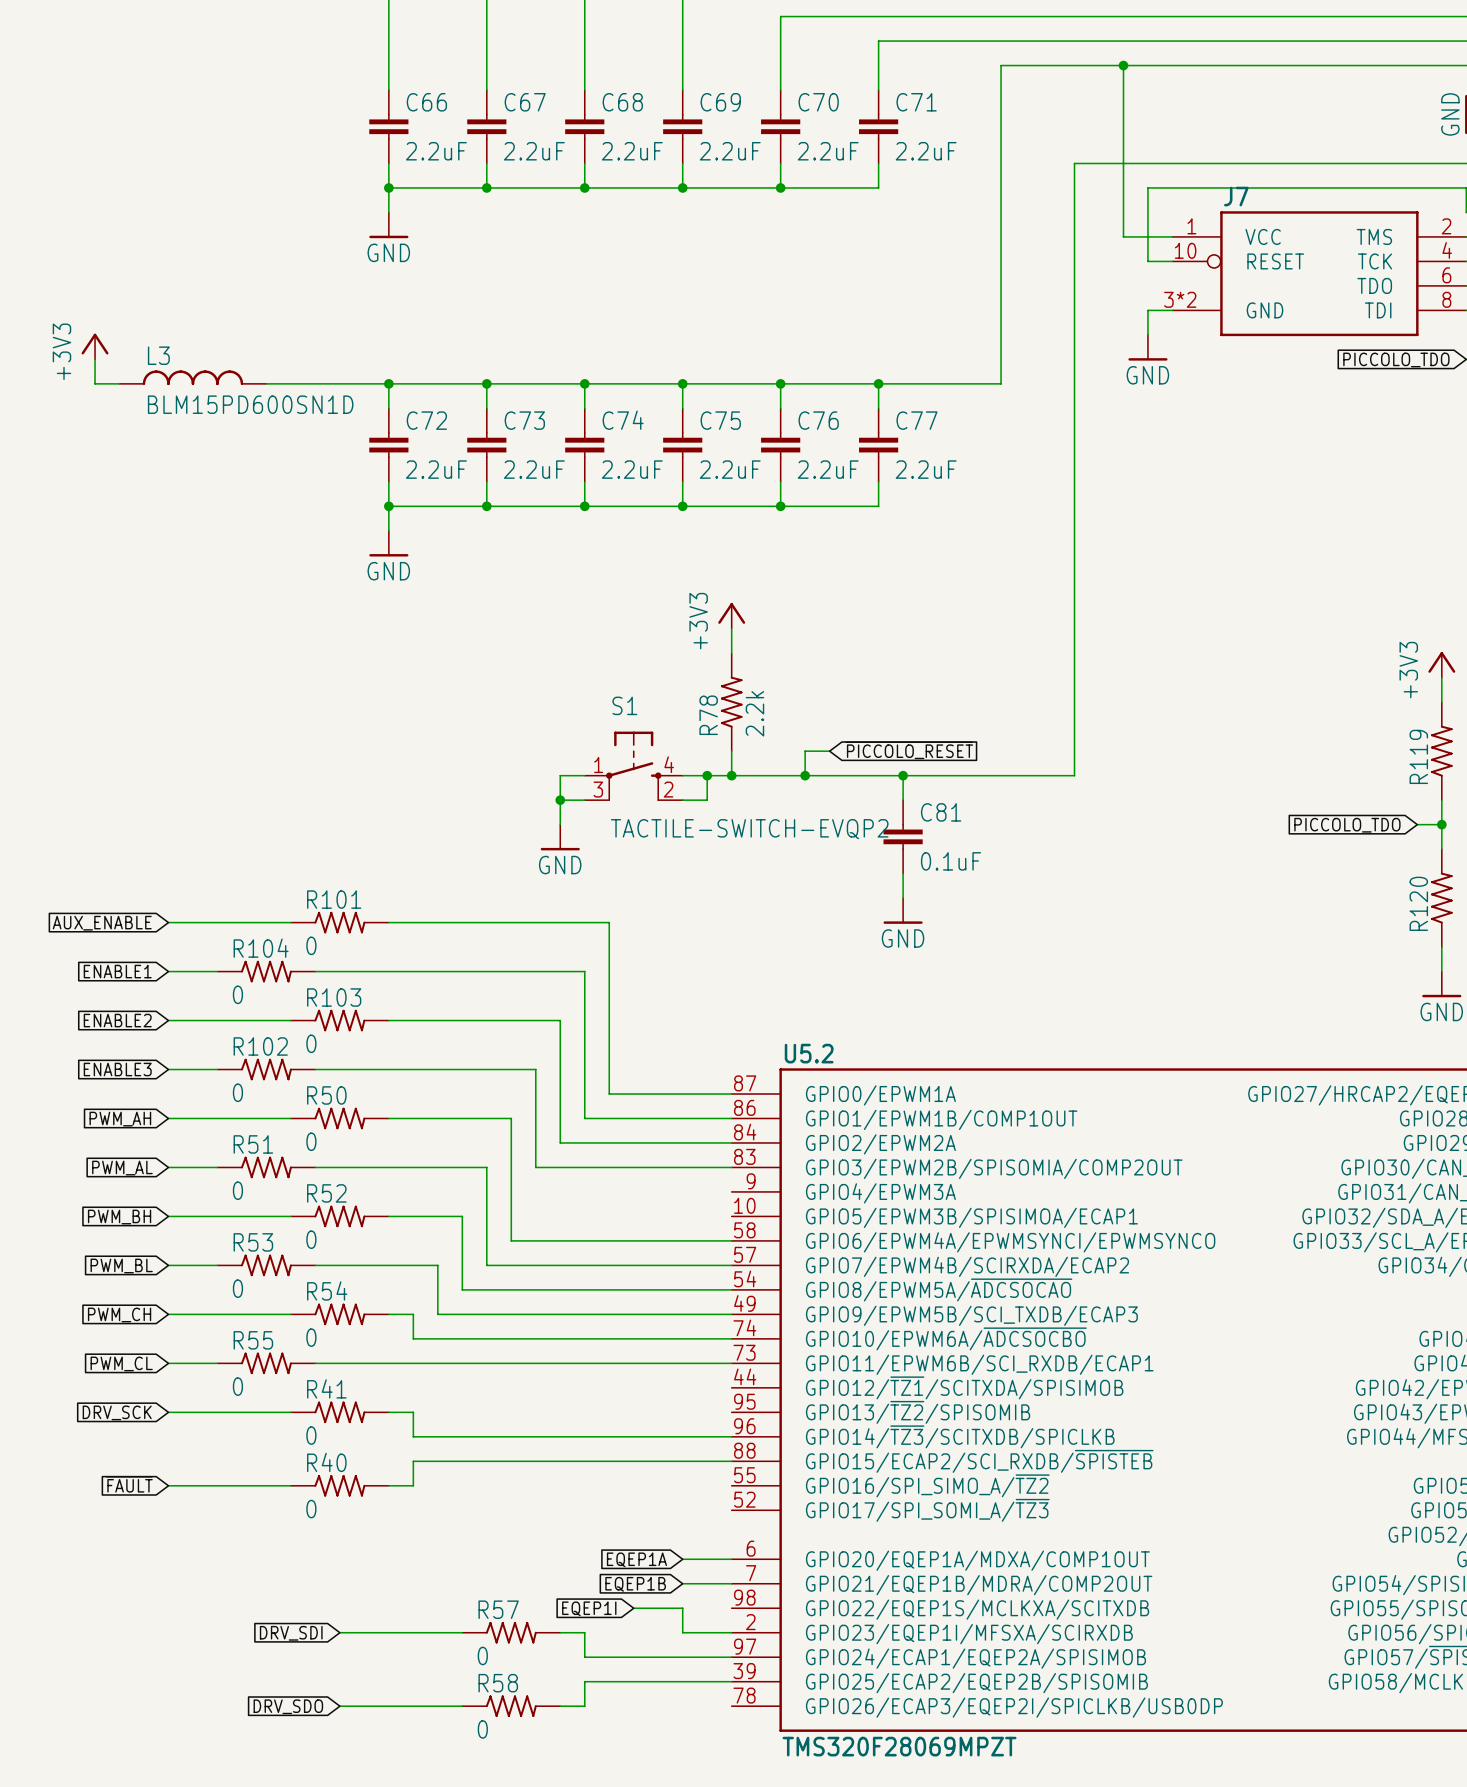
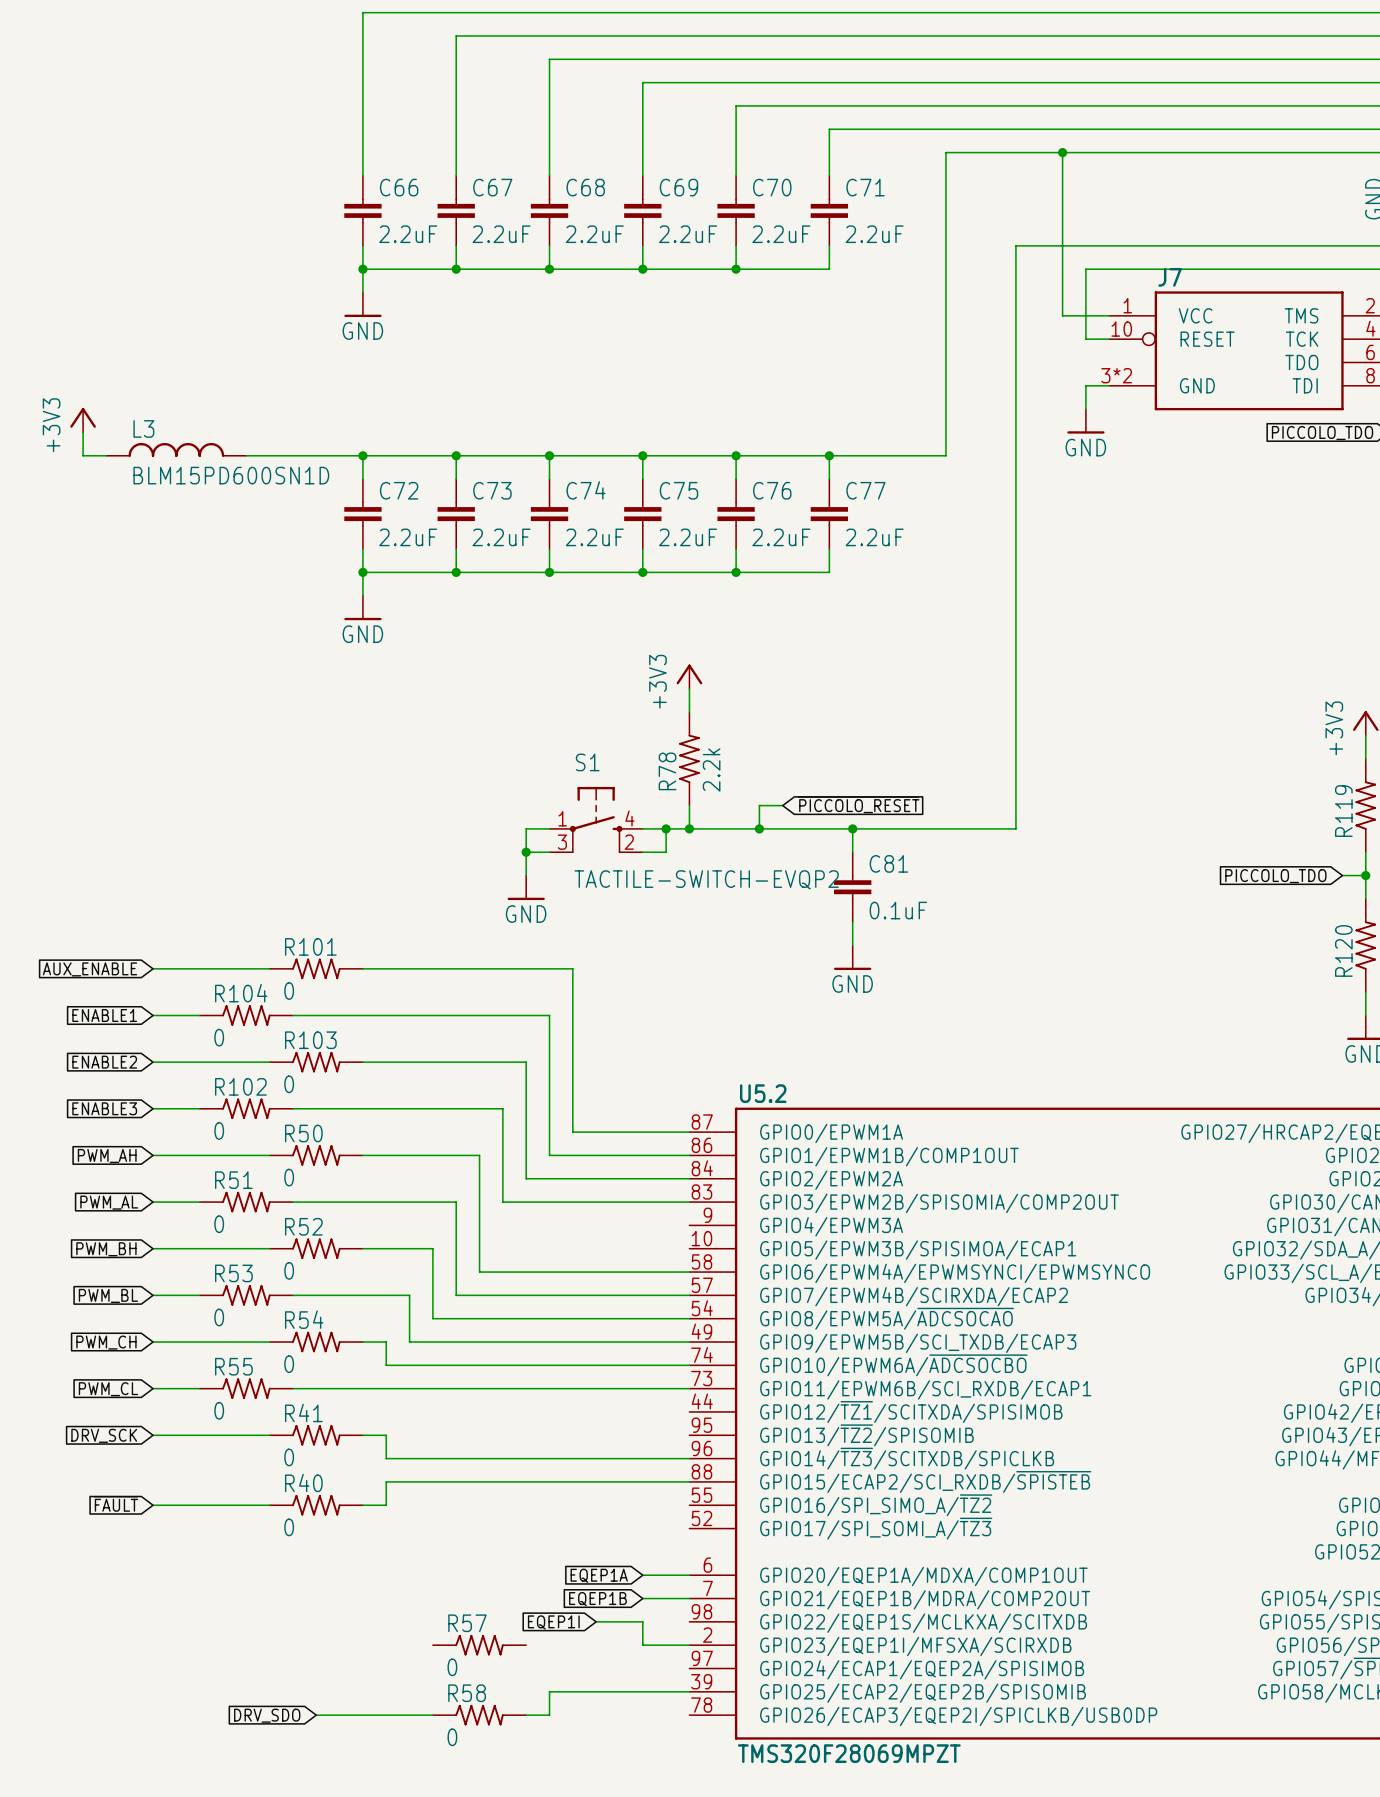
wire: (339, 1632) (462, 1632) -> none
wire: (560, 1632) (584, 1632) (584, 1657) (731, 1657) -> none
global label: DRV_SDI (291, 1633) -> none

